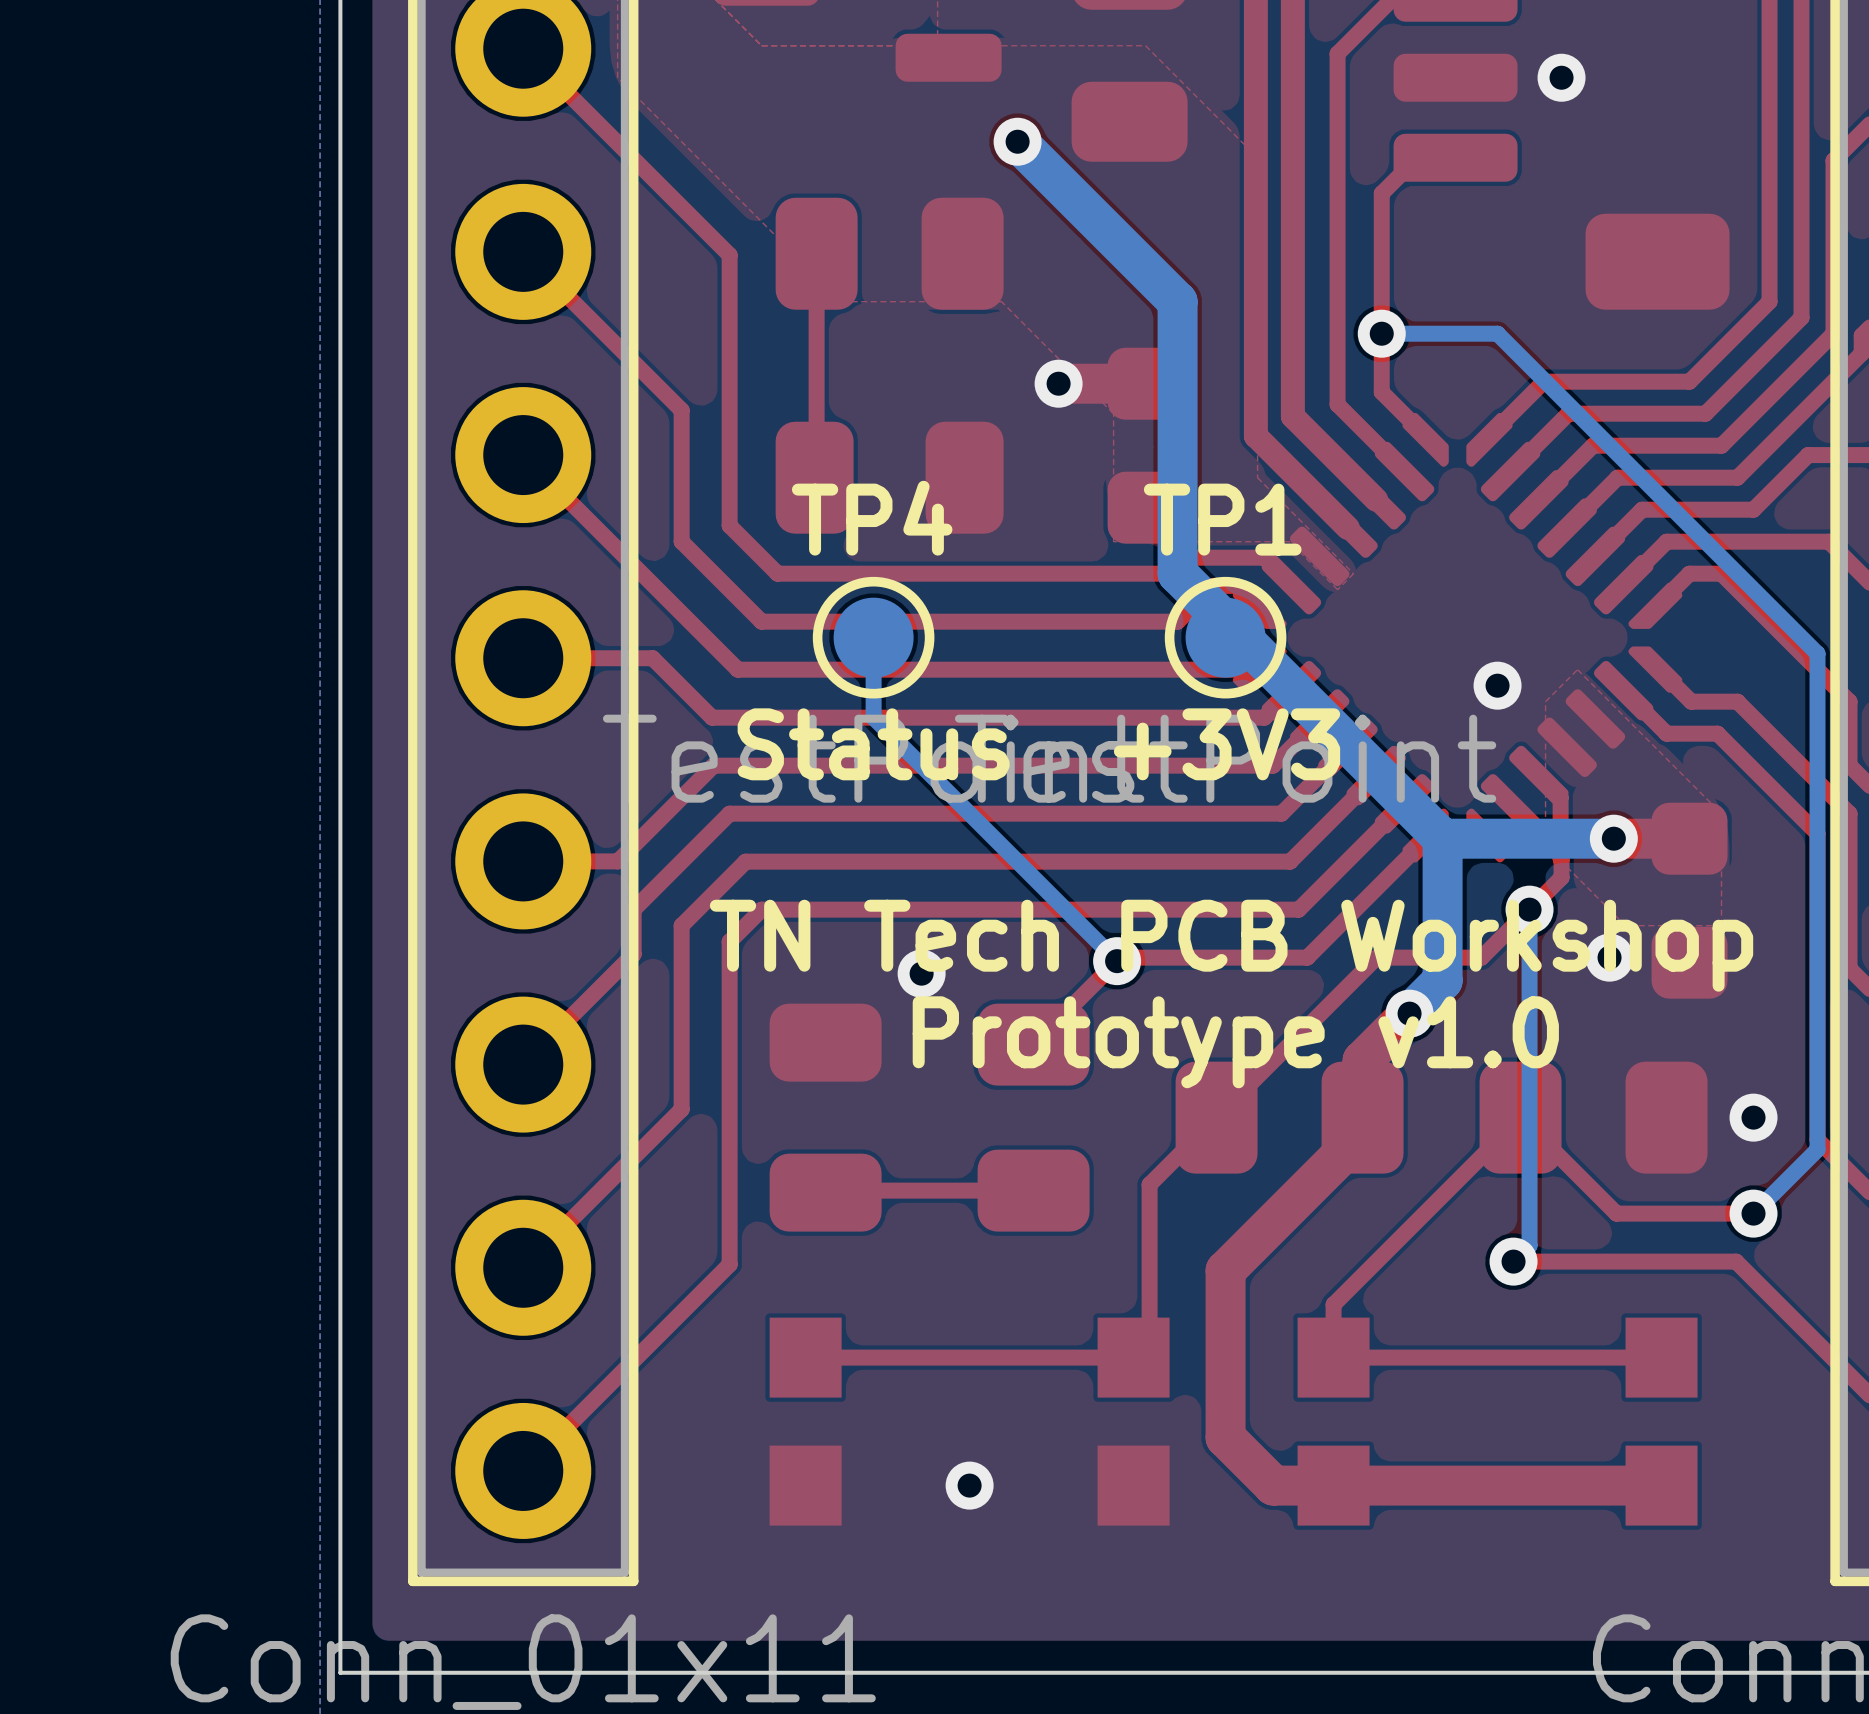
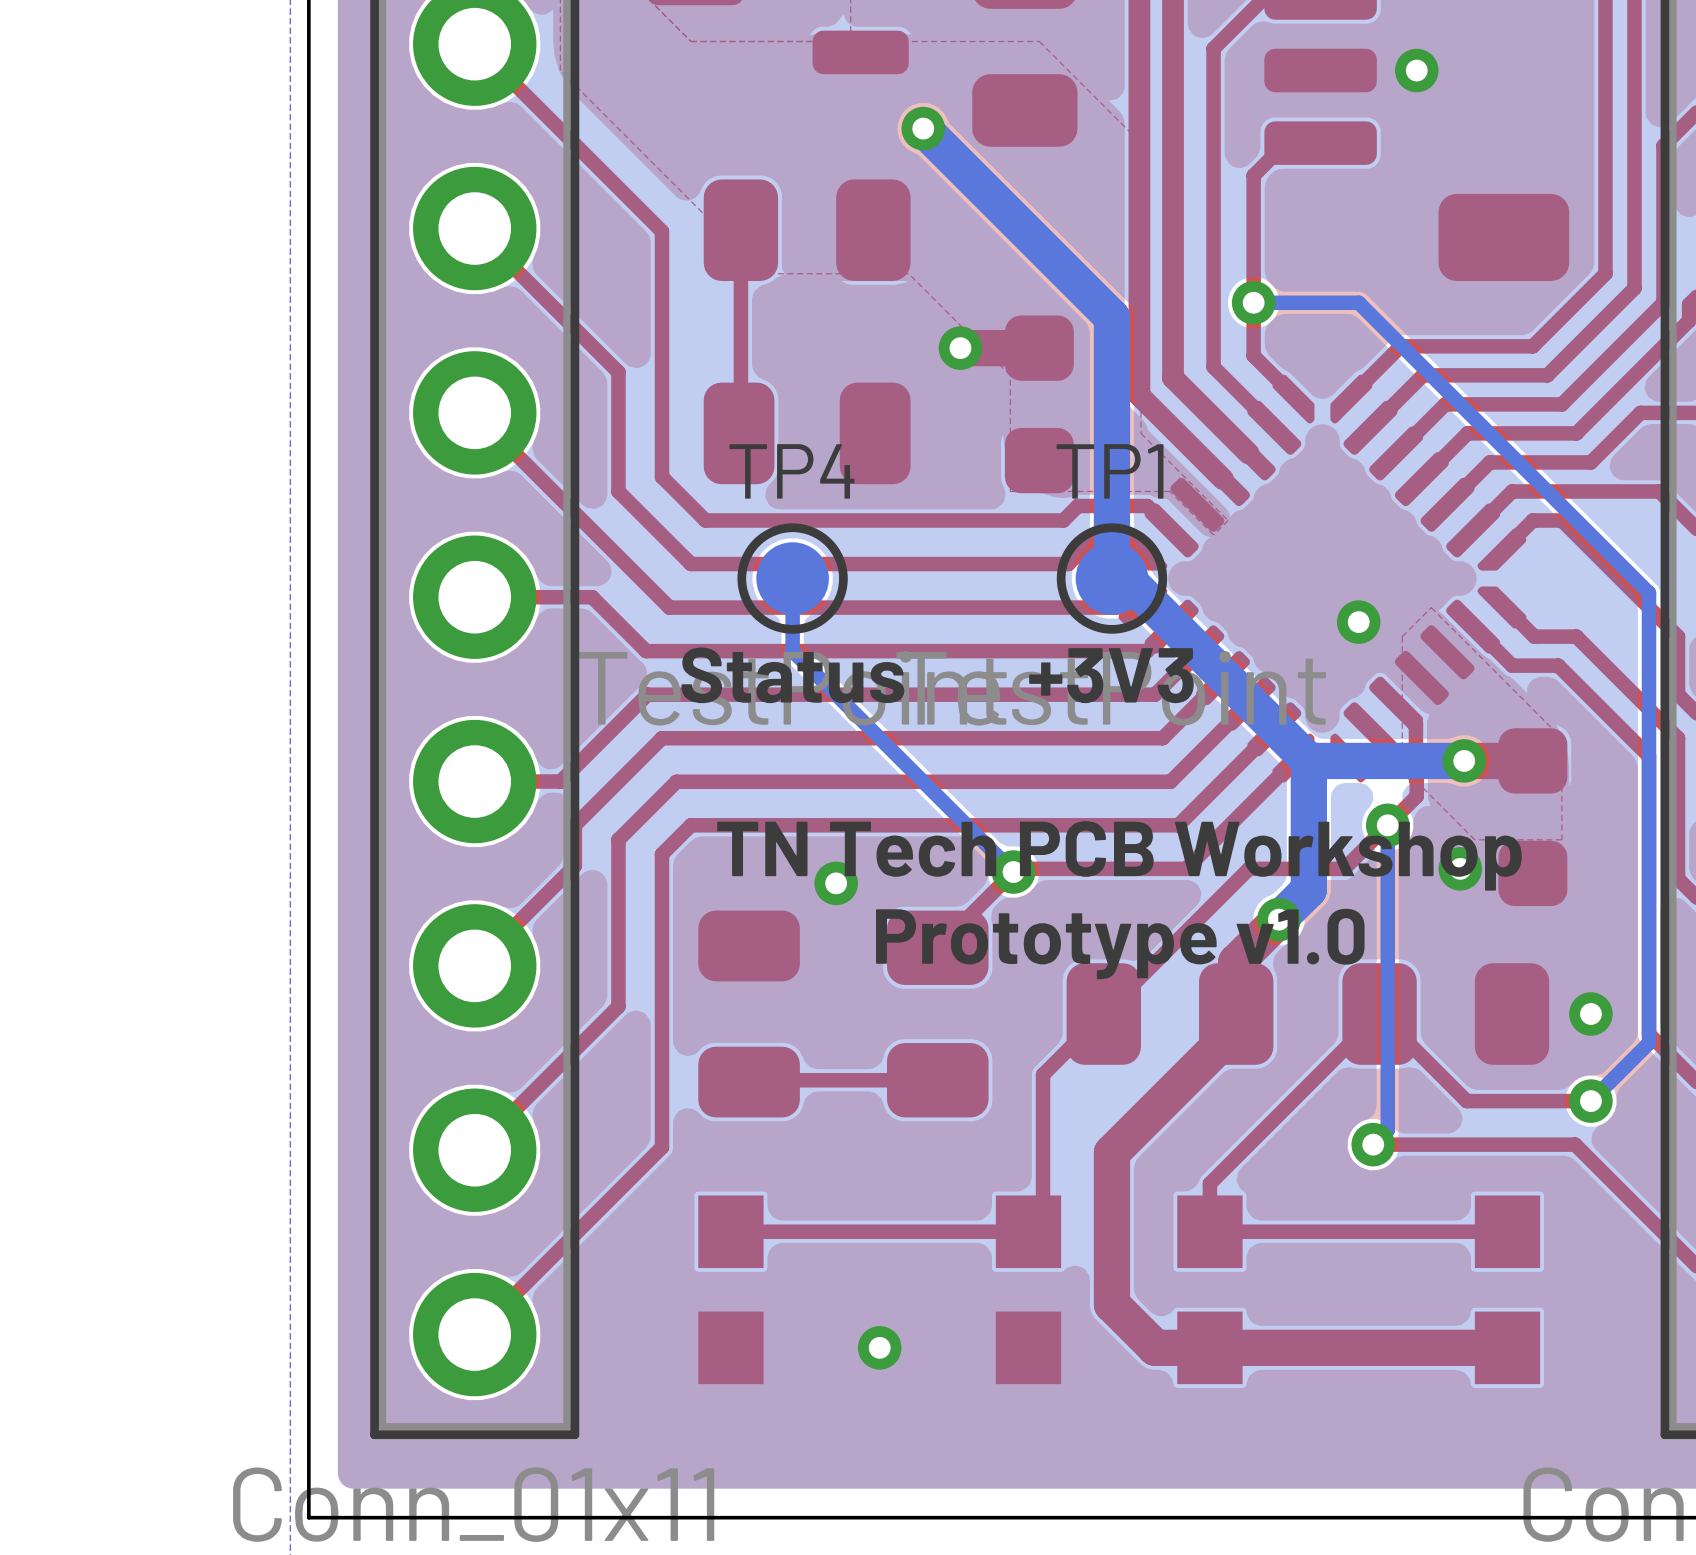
bottom track: (1177, 301) (1177, 573) (1225, 621) -> (1068, 273) (1111, 317) (1111, 564)

